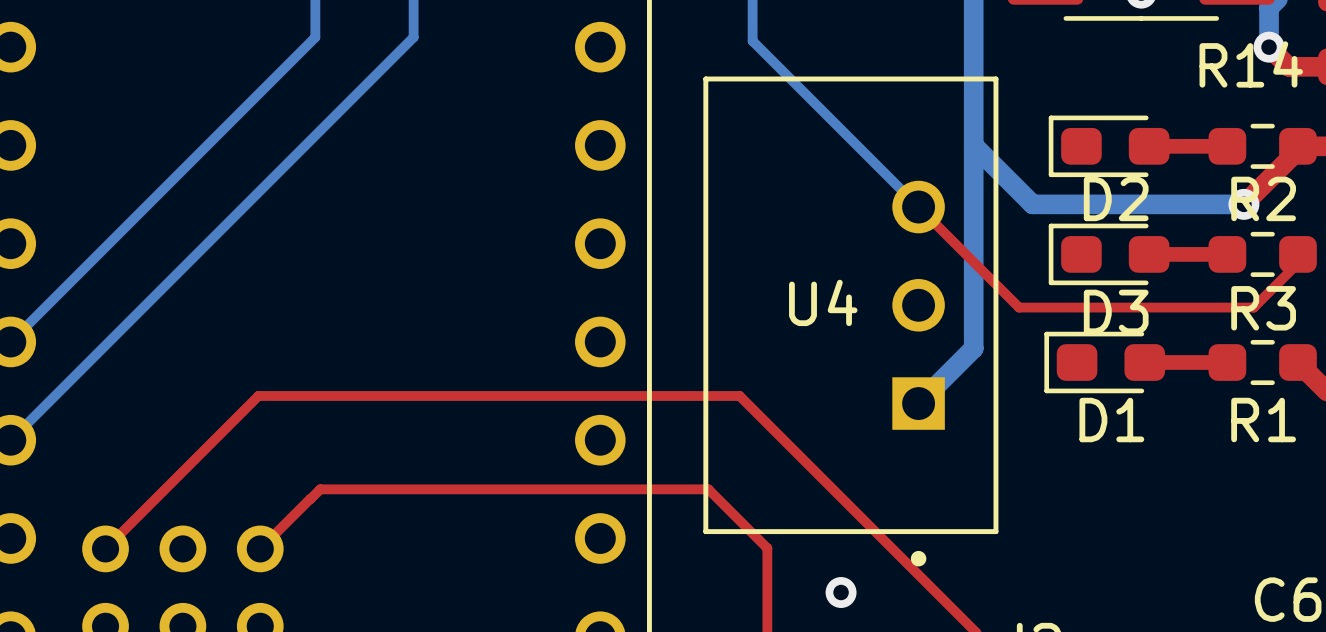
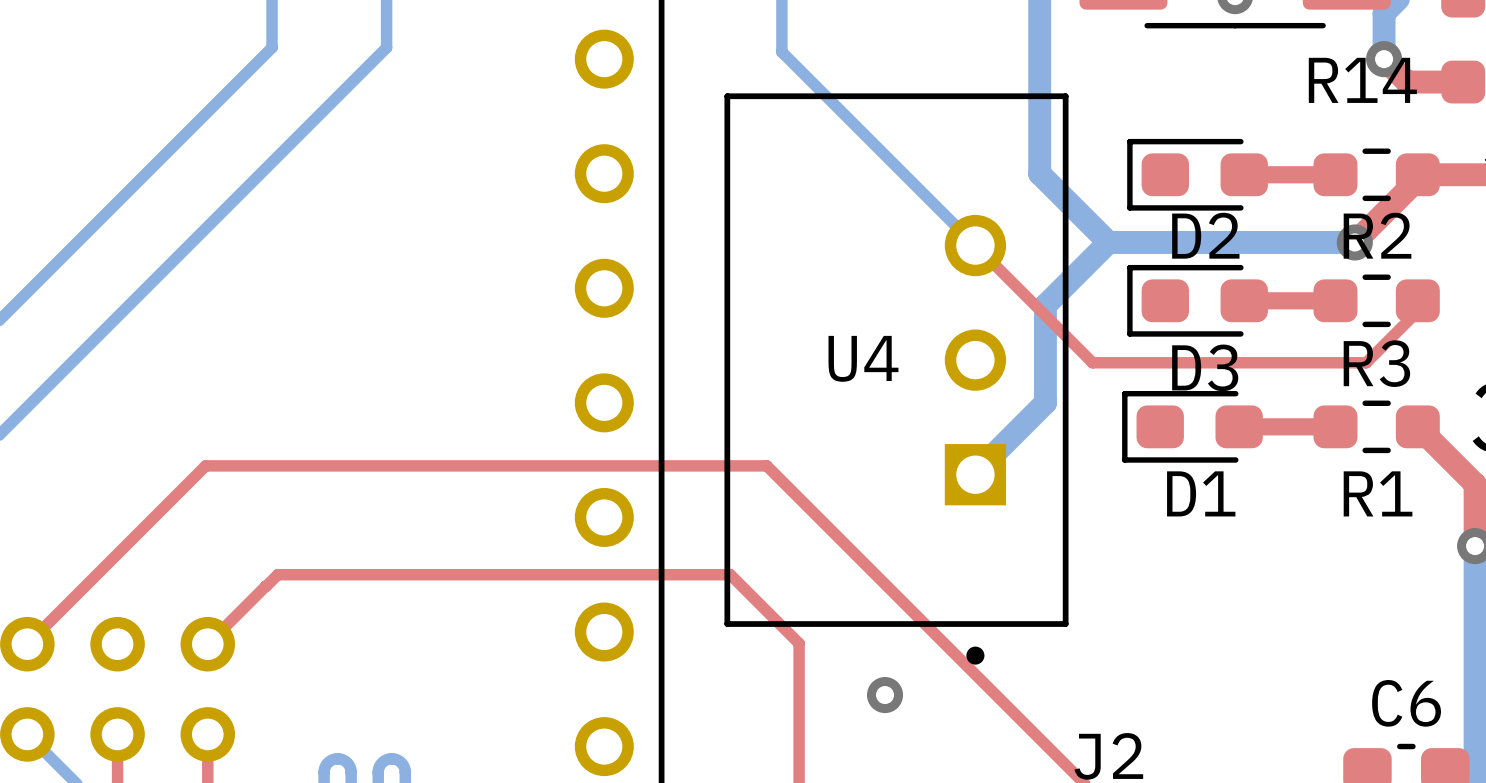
bottom track: (973, 145) (973, 348) (918, 403) -> (1108, 242) (1045, 305) (1045, 402) (975, 474)

